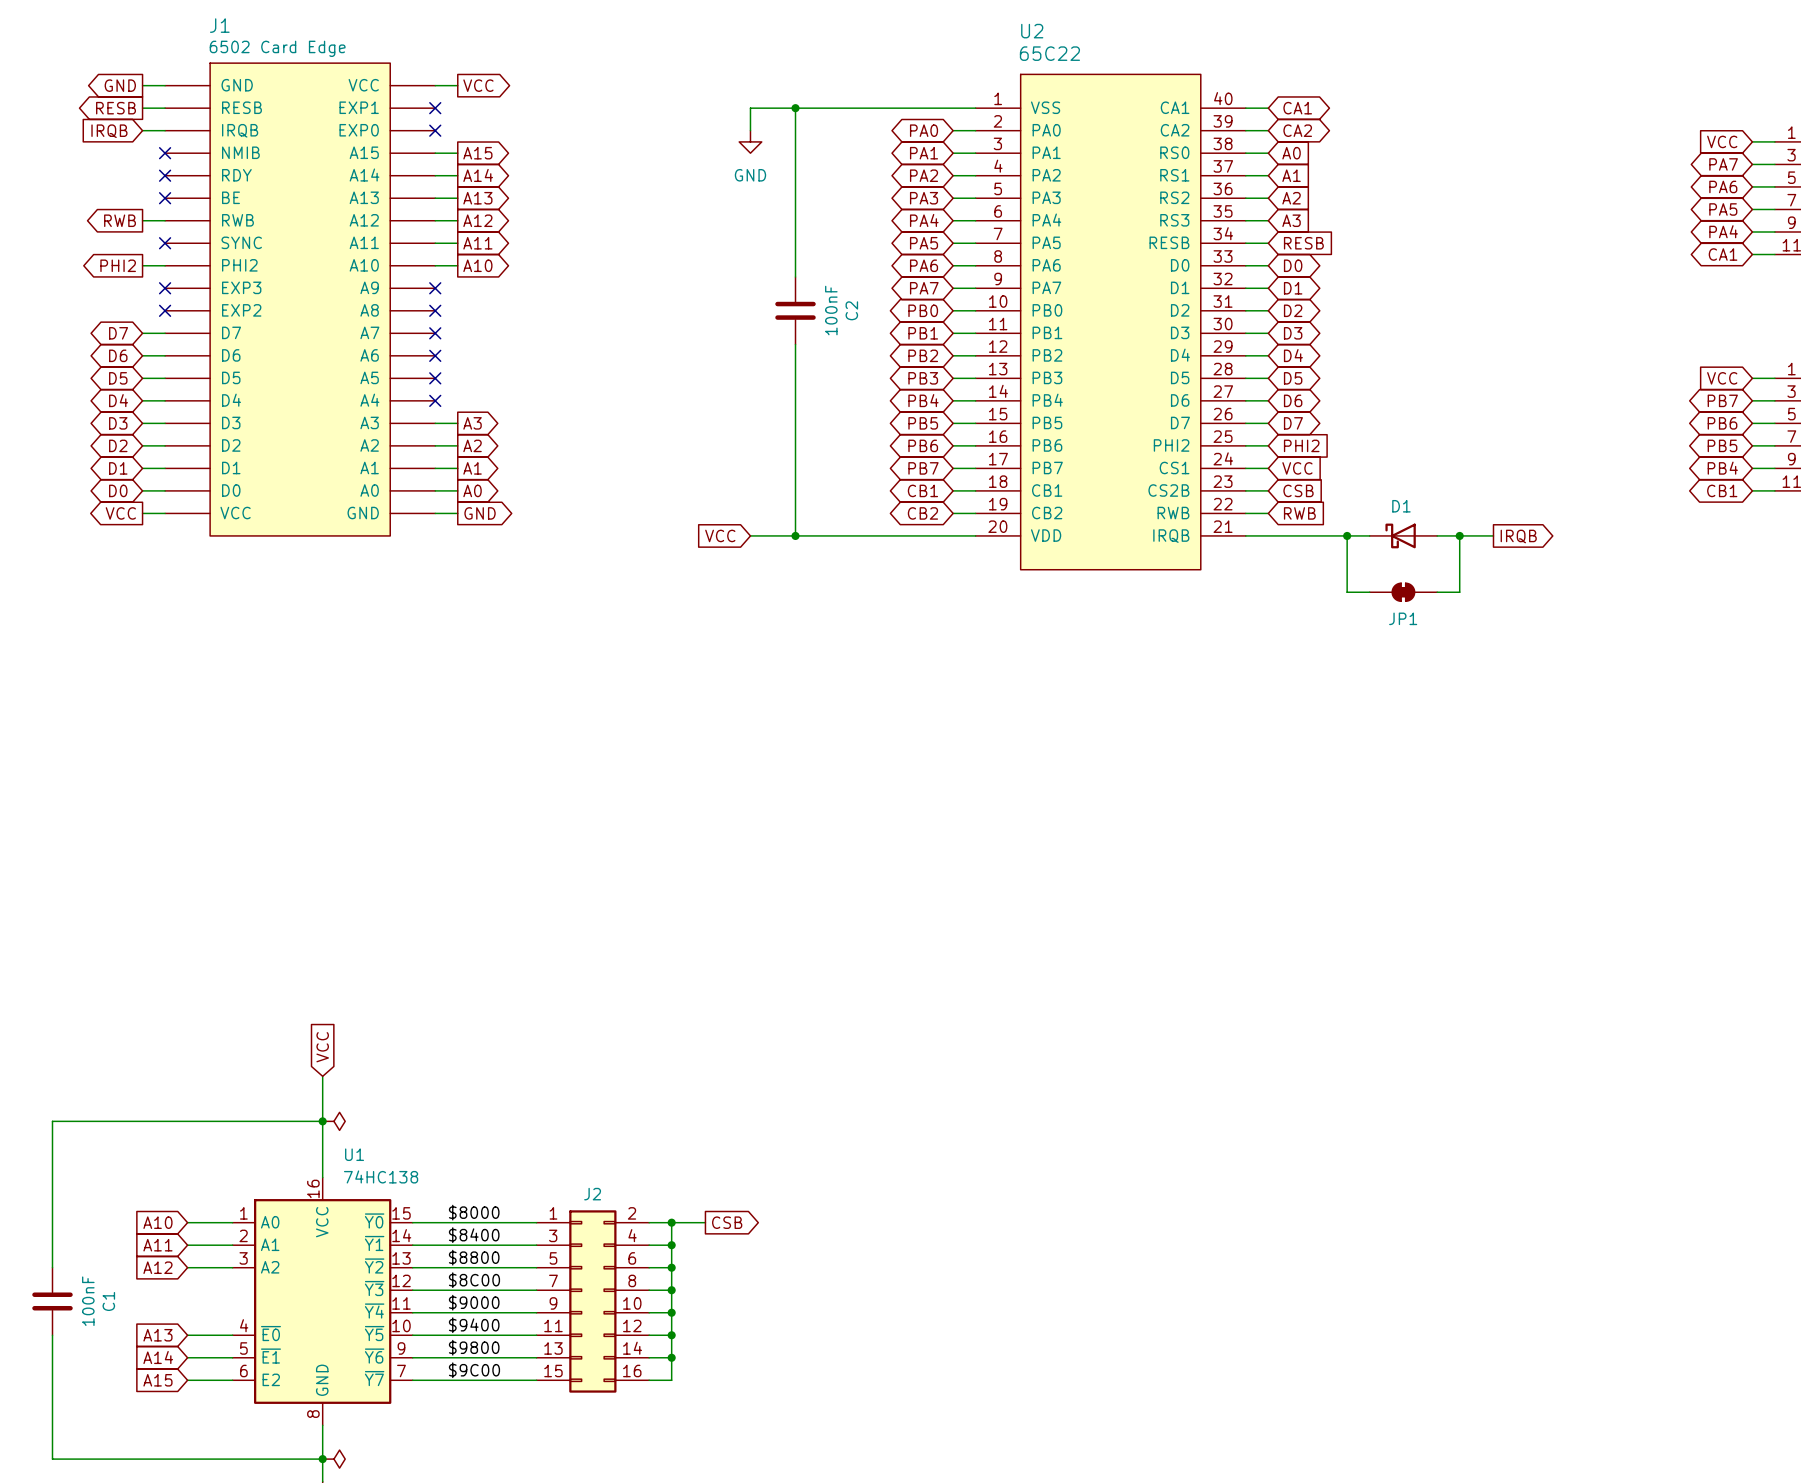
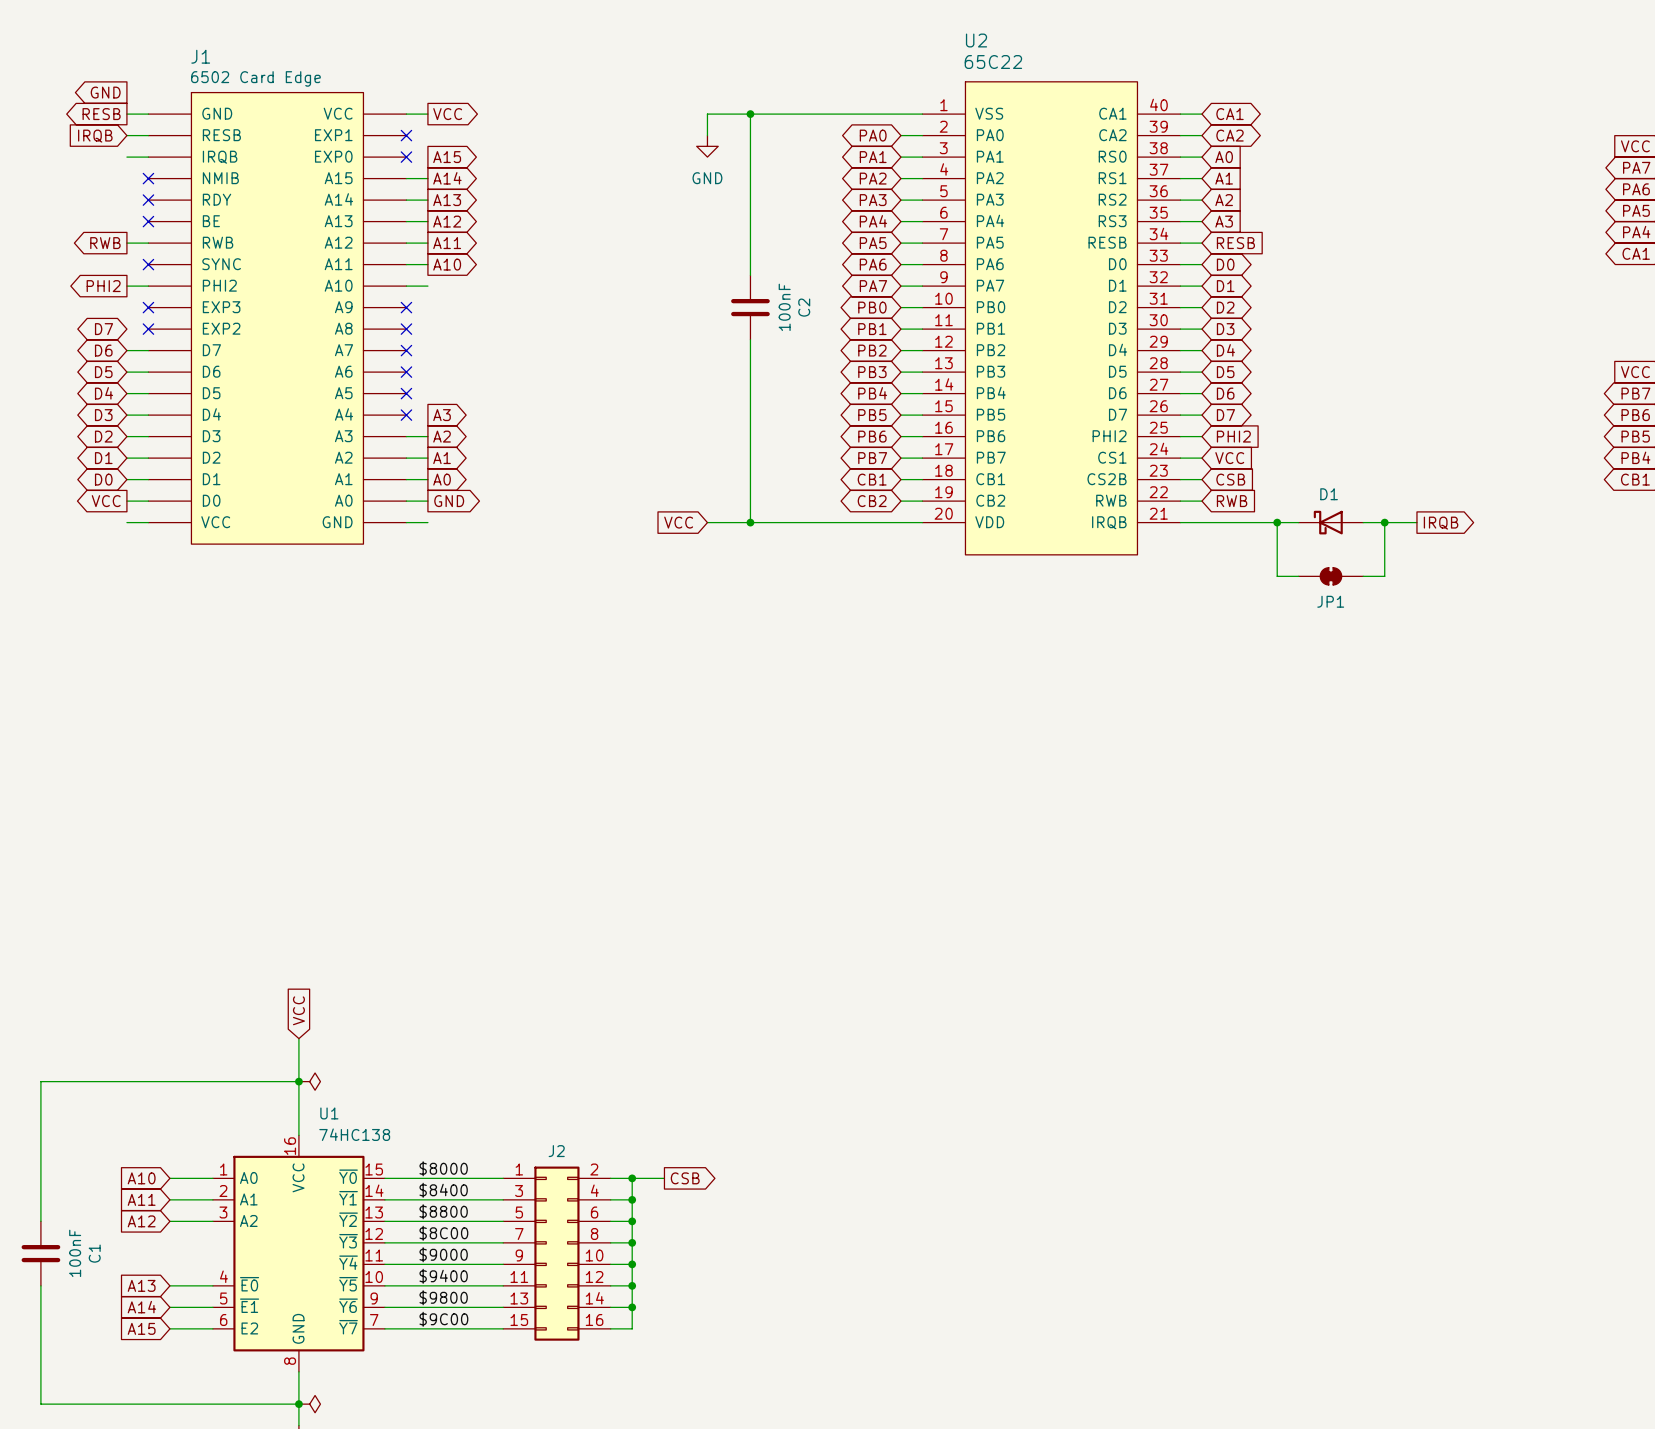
wire: (142, 85) (165, 85) -> (126, 157) (148, 157)
wire: (435, 85) (457, 85) -> (406, 114) (427, 114)
global label position: VCC (478, 85) -> VCC (447, 114)
no-connect mark position: (435, 108) -> (406, 157)
no-connect mark: (165, 153) -> none
wire: (435, 153) (457, 153) -> (406, 286) (427, 286)
global label position: RWB (120, 220) -> RWB (105, 243)
wire: (142, 220) (165, 220) -> (126, 243) (148, 243)
no-connect mark: none -> (148, 221)
no-connect mark: (165, 243) -> none
global label position: PHI2 (118, 265) -> PHI2 (103, 286)
wire: (142, 265) (165, 265) -> (126, 286) (148, 286)
no-connect mark: none -> (148, 264)
no-connect mark: (165, 288) -> none
no-connect mark: (435, 288) -> none
J1 position: (300, 299) -> (277, 318)
wire: (142, 333) (165, 333) -> (126, 522) (148, 522)
no-connect mark: none -> (148, 329)
wire: (435, 423) (457, 423) -> (406, 522) (427, 522)
no-connect mark: none -> (406, 415)

